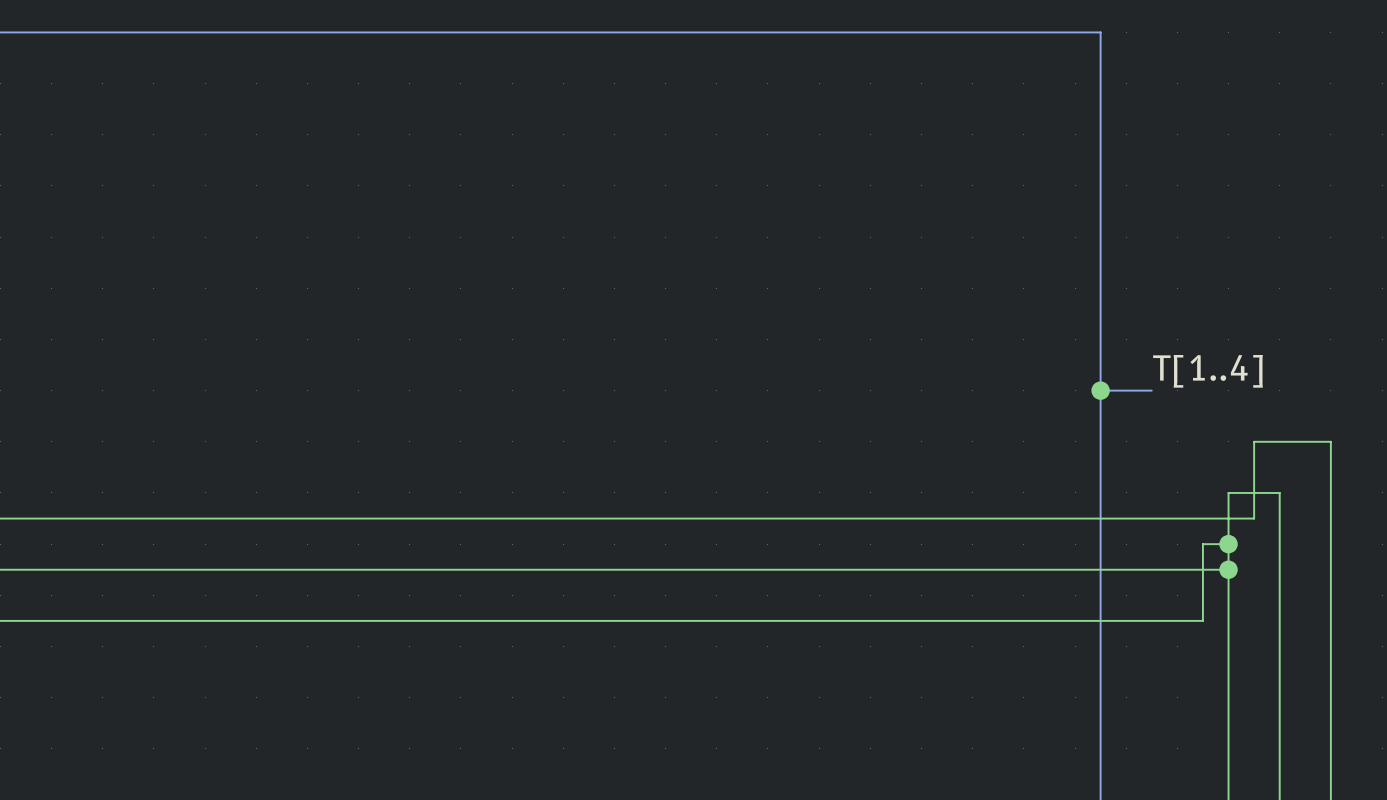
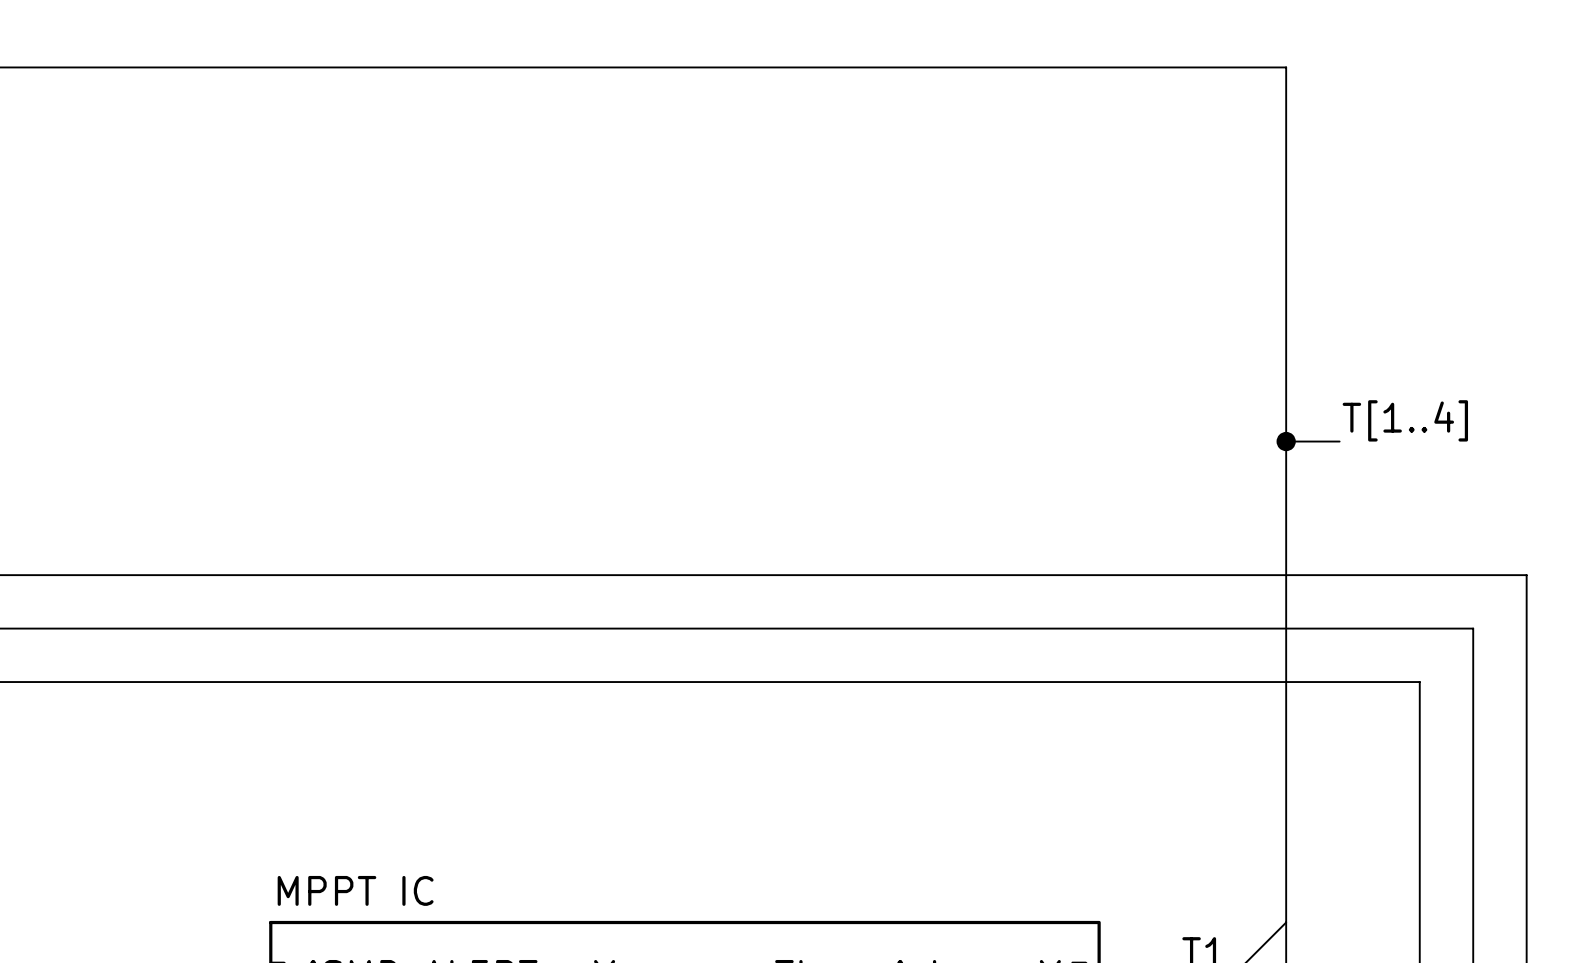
wire: (1254, 518) (1254, 441) (1330, 441) (1330, 518) -> (1446, 575) (1526, 575)
wire: (1228, 544) (1202, 544) (1202, 620) -> (1419, 682) (1393, 682)
junction: (1228, 544) -> none
junction: (1228, 569) -> none
wire: (1279, 569) (1279, 492) (1228, 492) (1228, 620) -> (1473, 628) (1419, 628)

